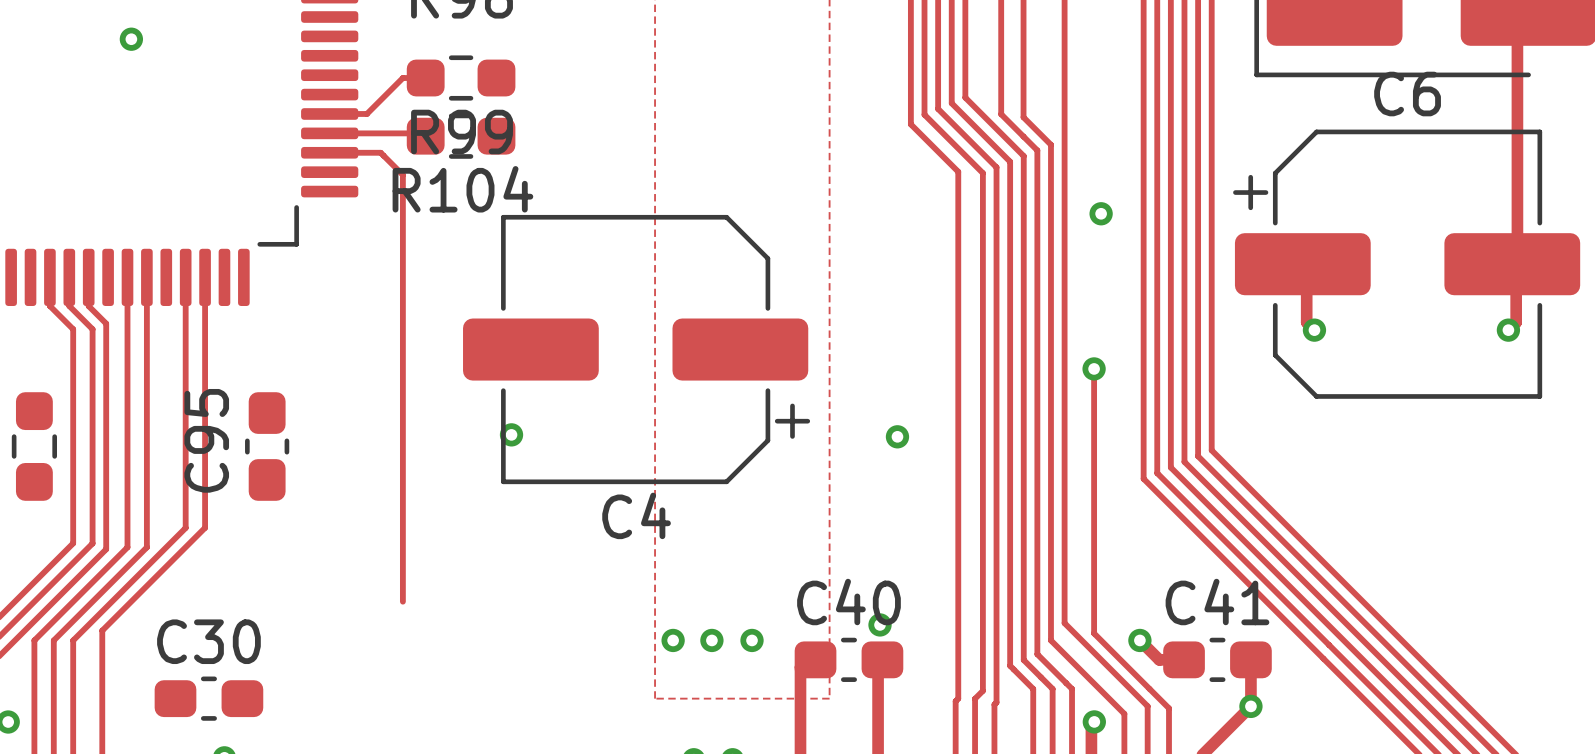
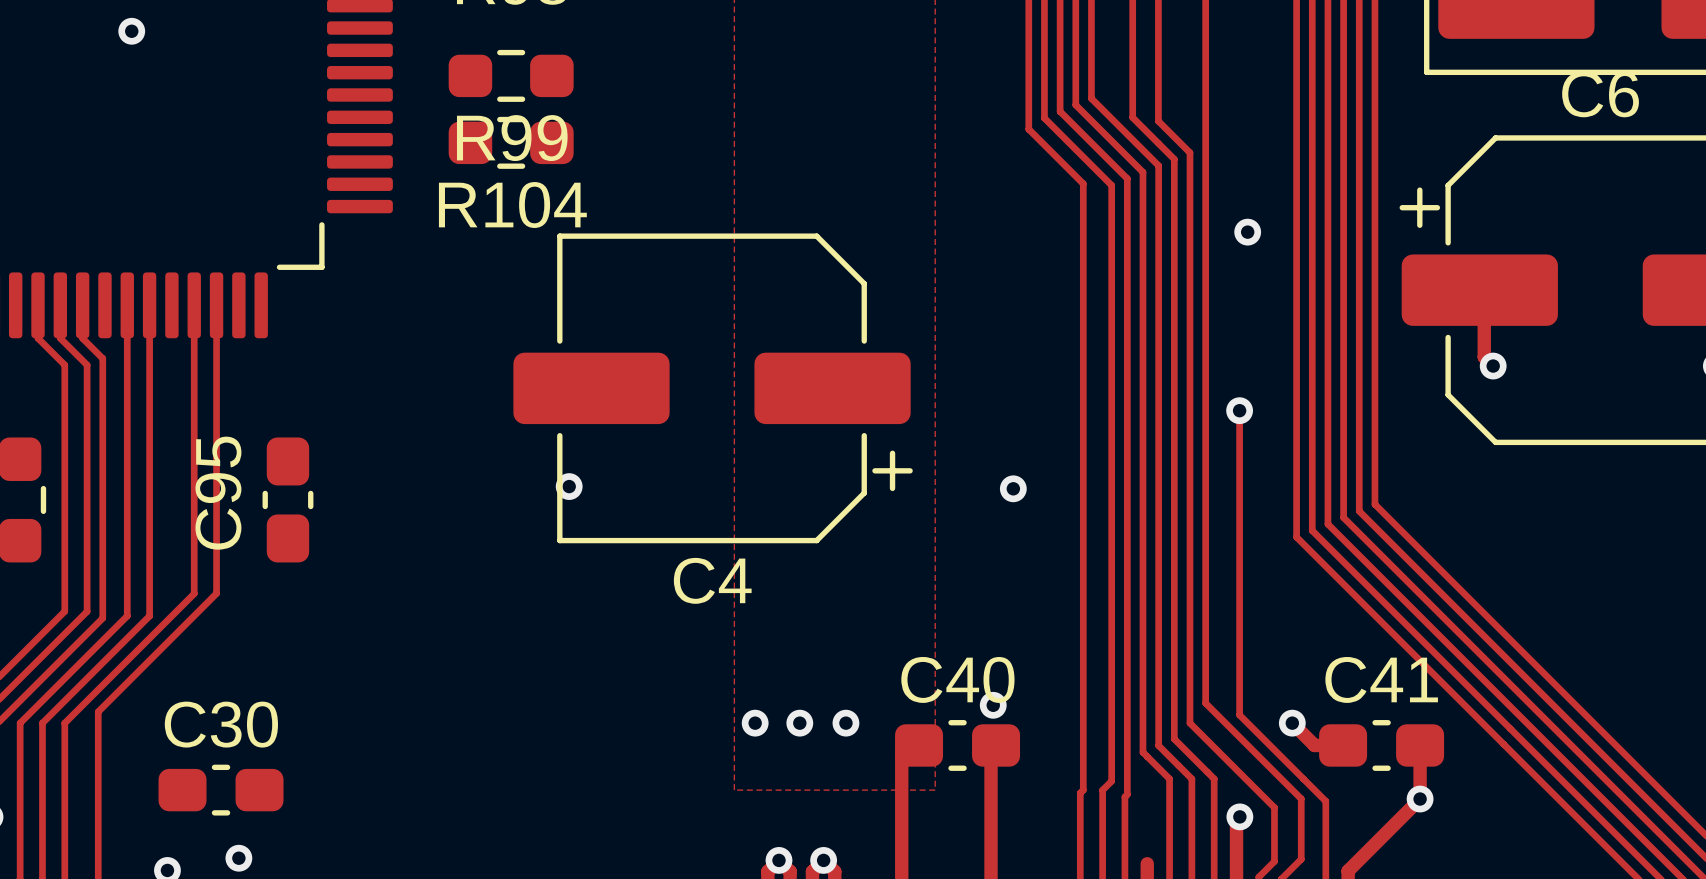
track: (425, 78) (402, 78) (366, 113) (329, 113) -> none
track: (329, 133) (422, 133) (425, 136) -> none
track: (329, 152) (380, 152) (402, 174) (402, 601) -> none

